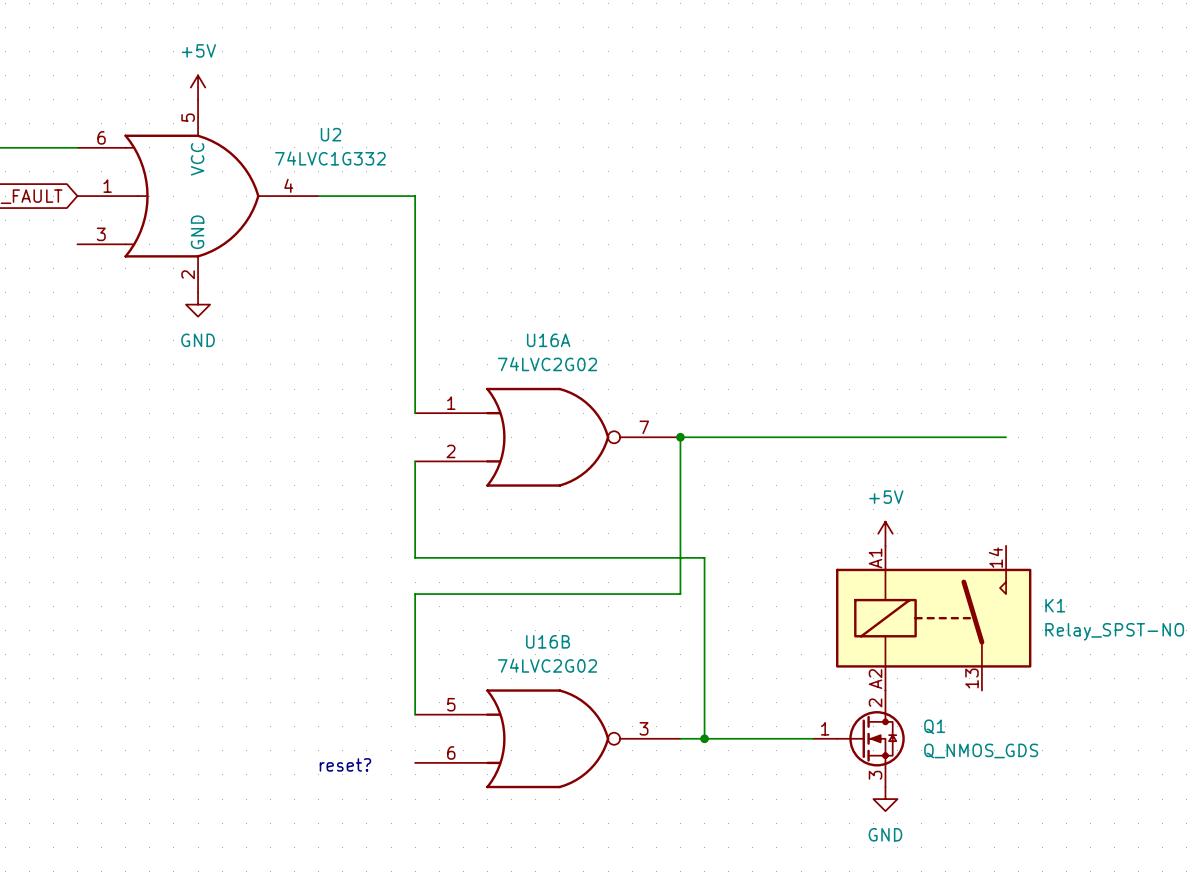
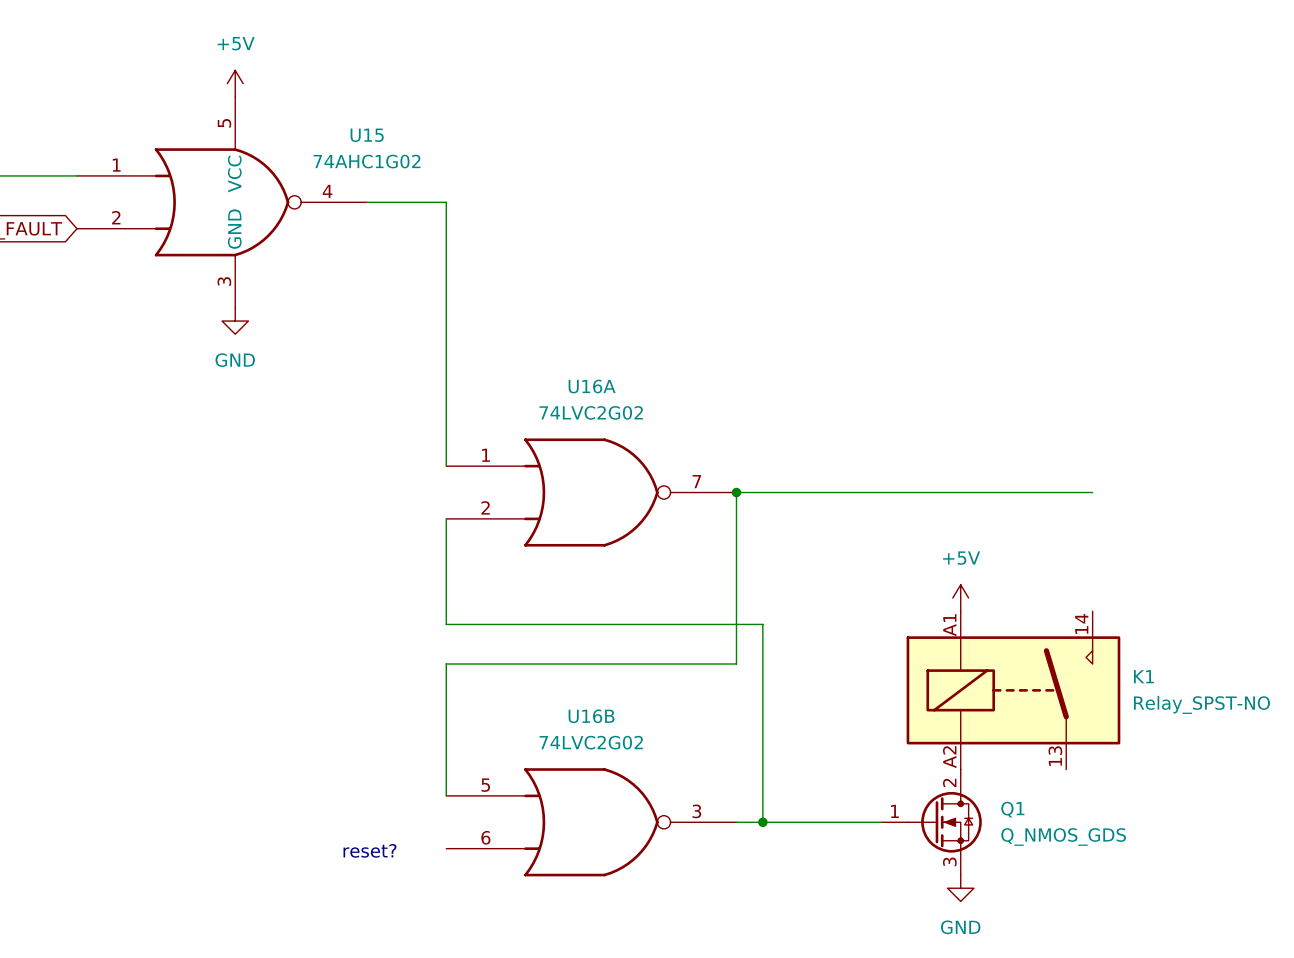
power symbol position: +5V (198, 87) -> +5V (235, 83)
U15: none -> 74AHC1G02 (222, 202)
U2: 74LVC1G332 (198, 196) -> none
wire: (318, 196) (415, 196) -> (367, 202) (446, 202) (446, 228)
power symbol position: GND (198, 304) -> GND (235, 321)

